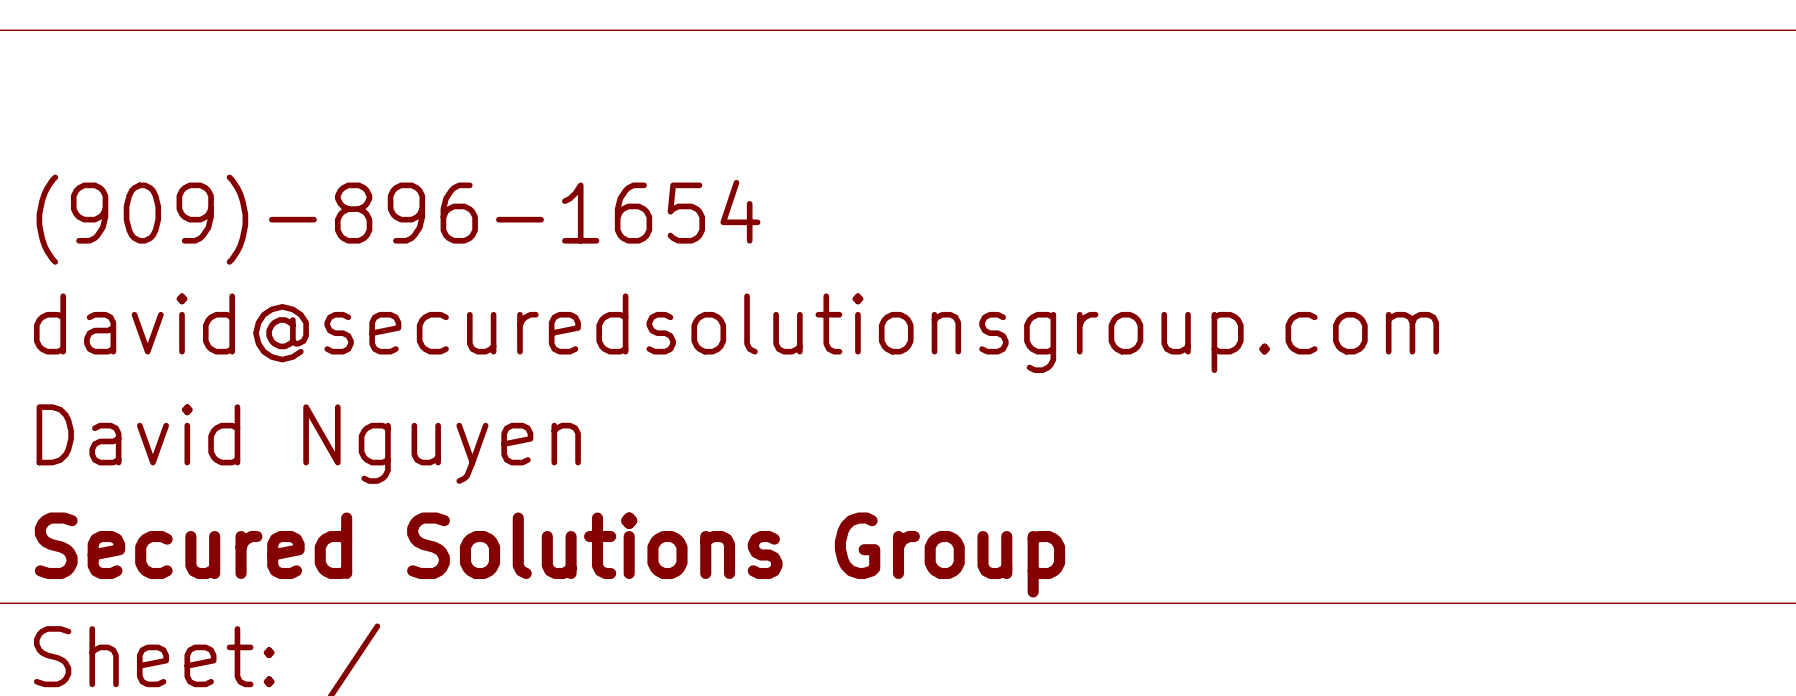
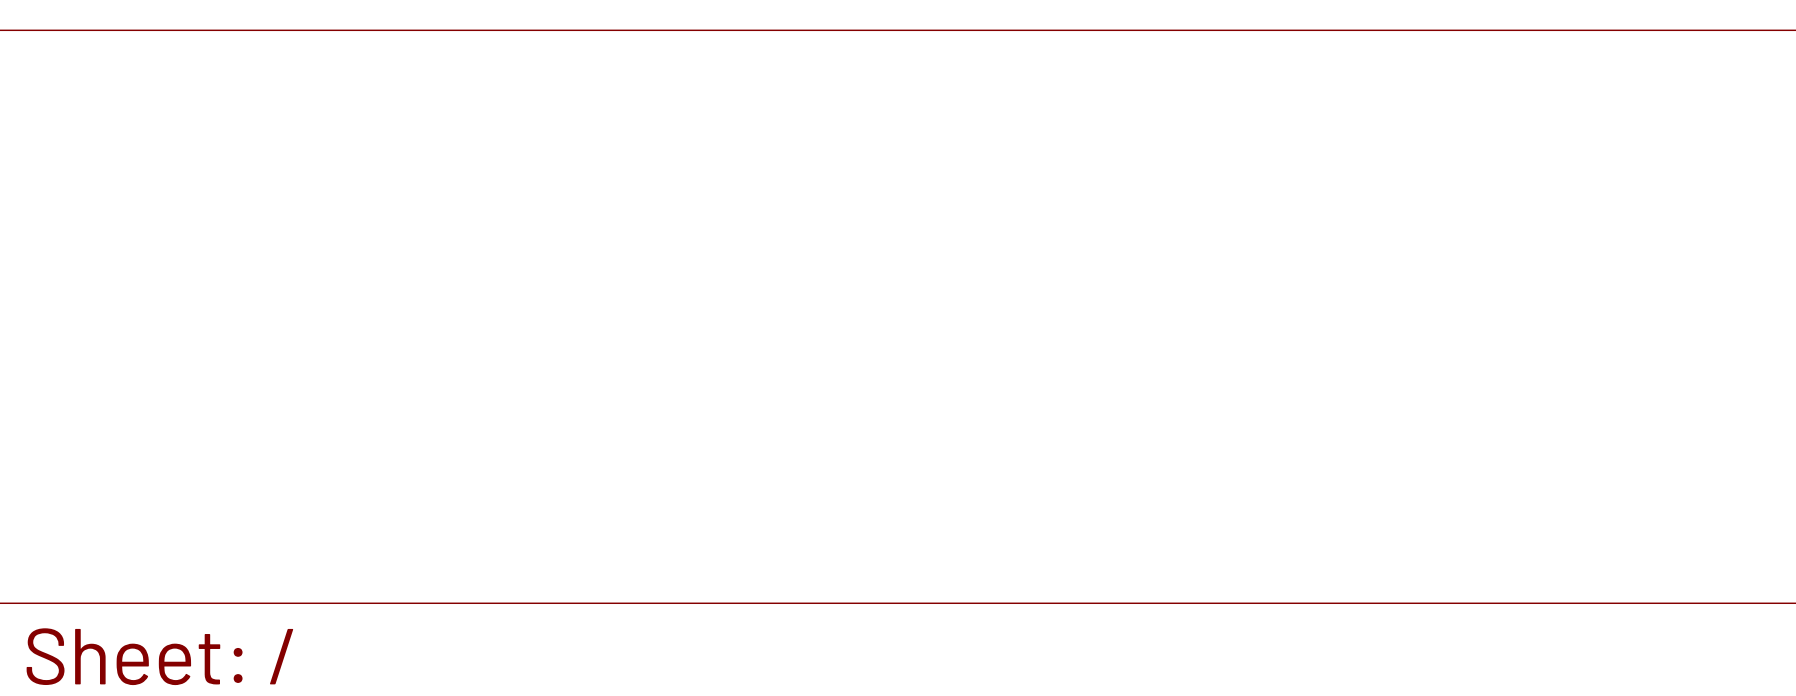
title block: (909)-896-1654 (398, 219) -> none
title block: david@securedsolutionsgroup.com (736, 333) -> none
title block: David Nguyen (308, 444) -> none
title block: Secured Solutions Group (549, 555) -> none

